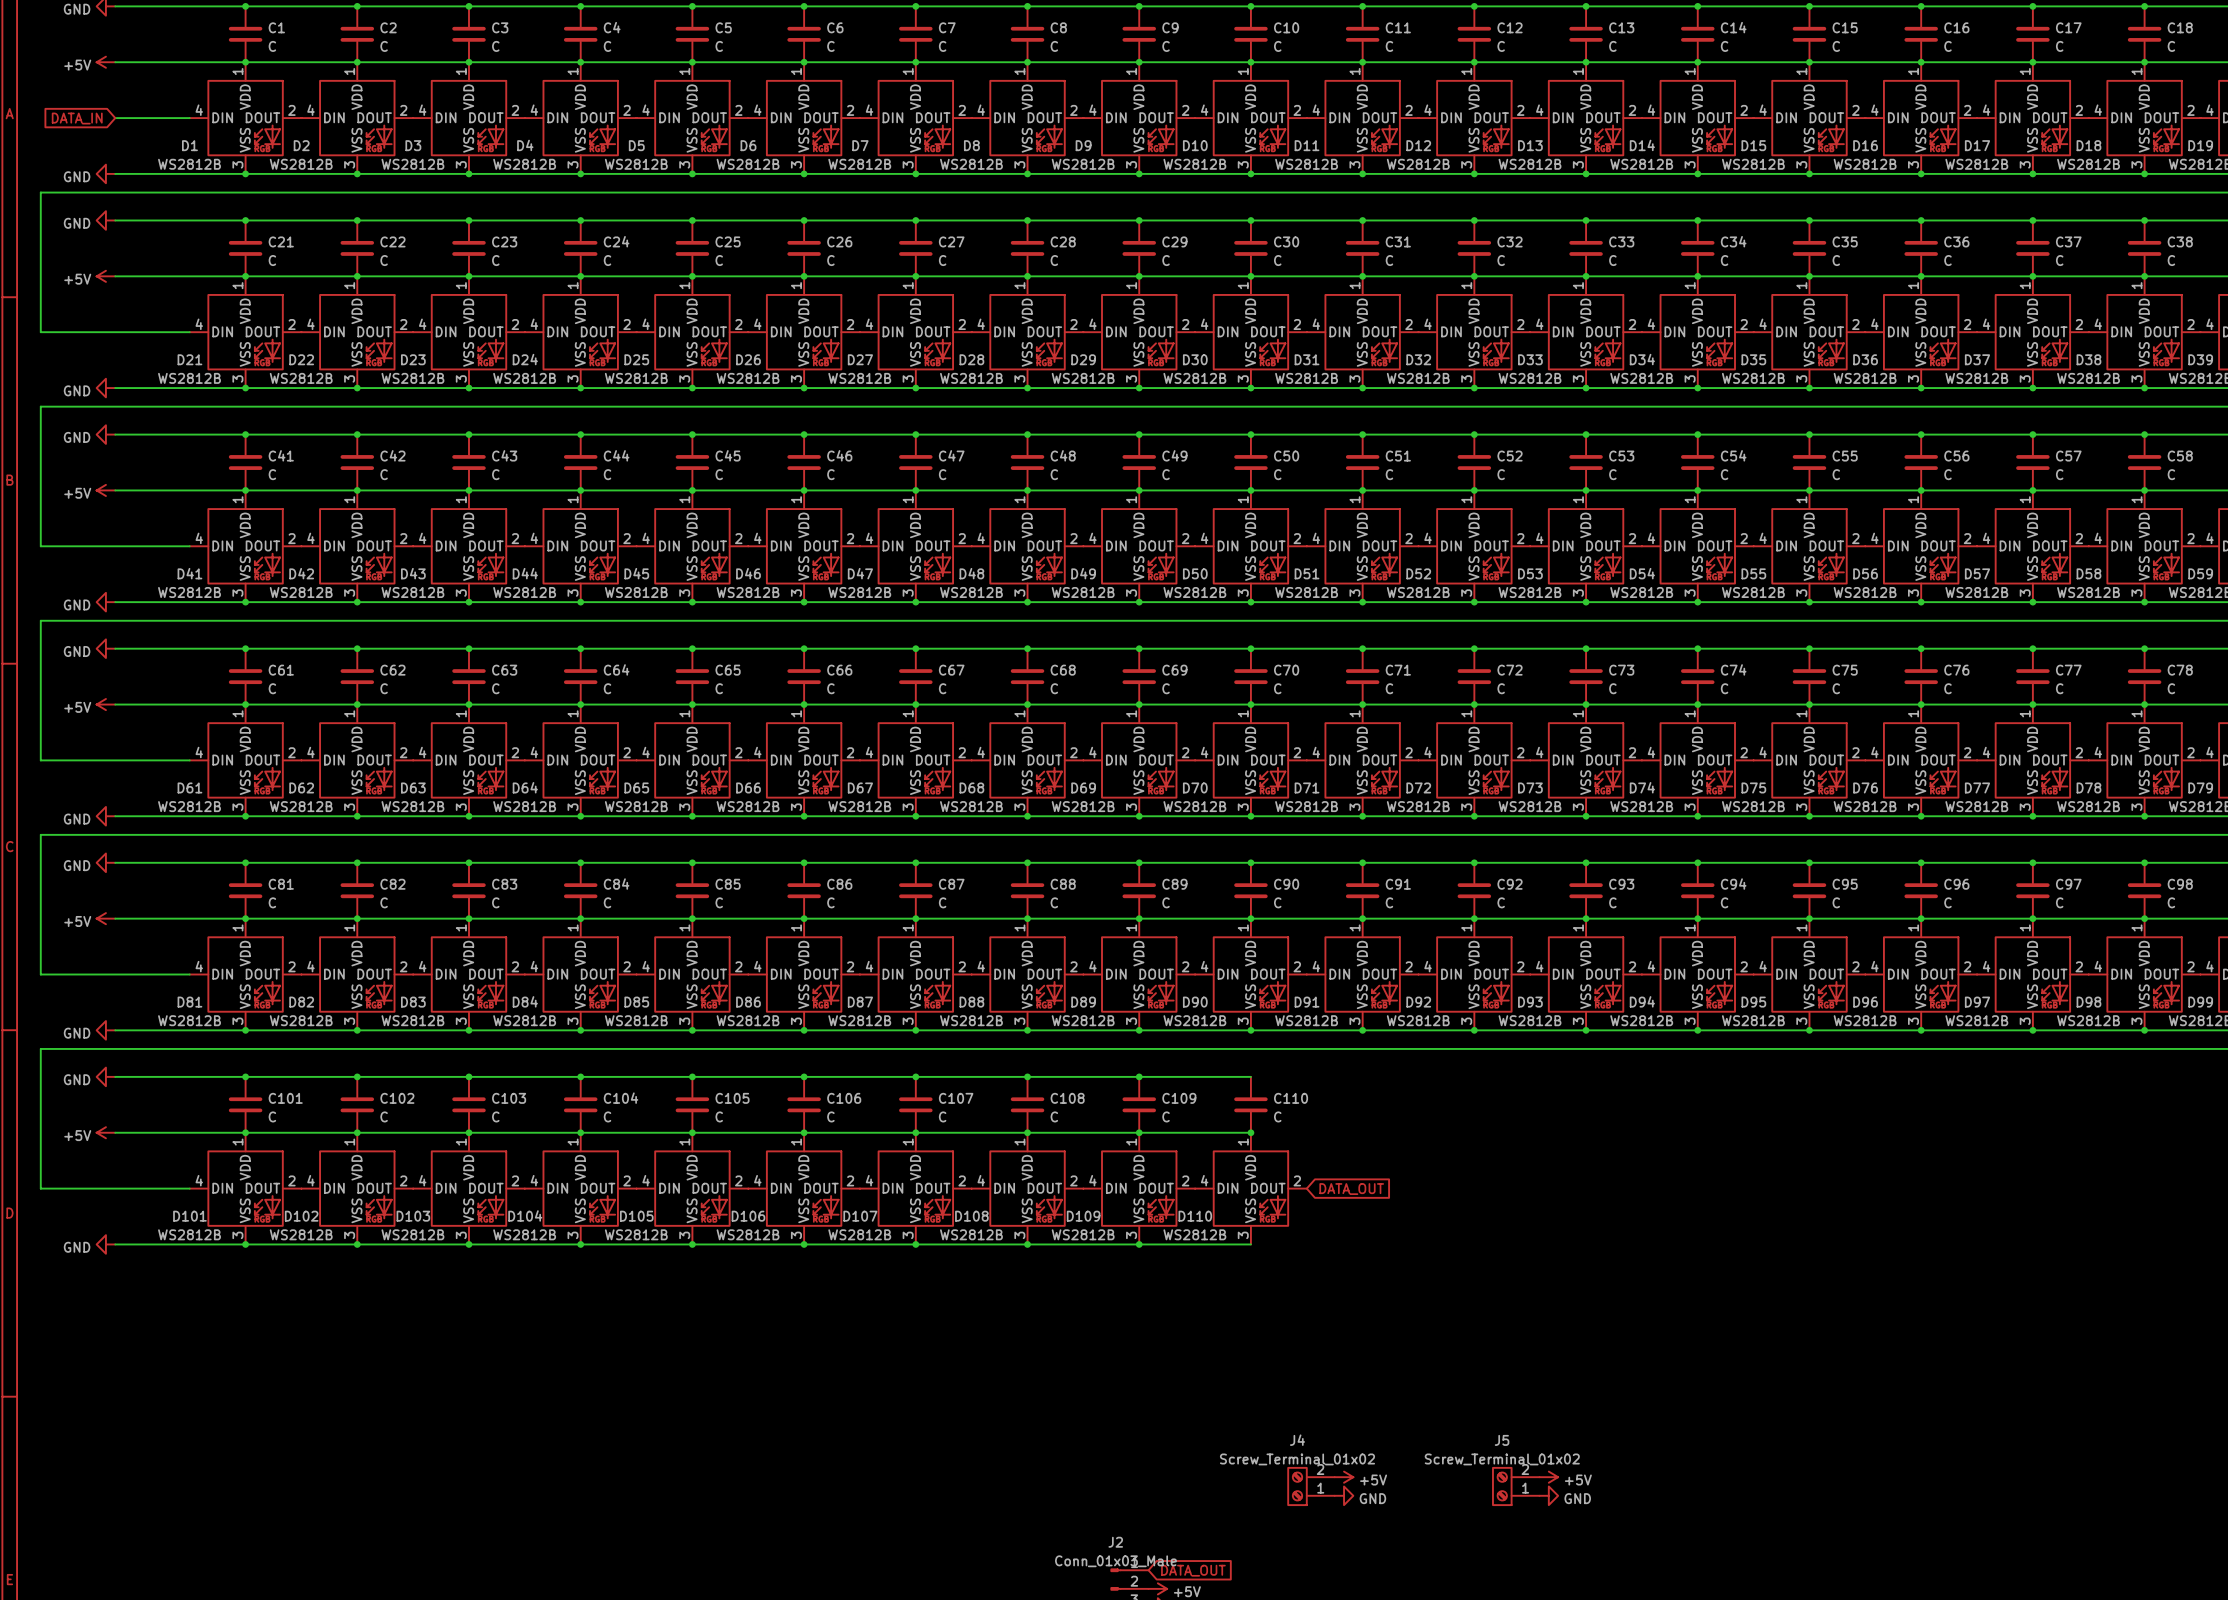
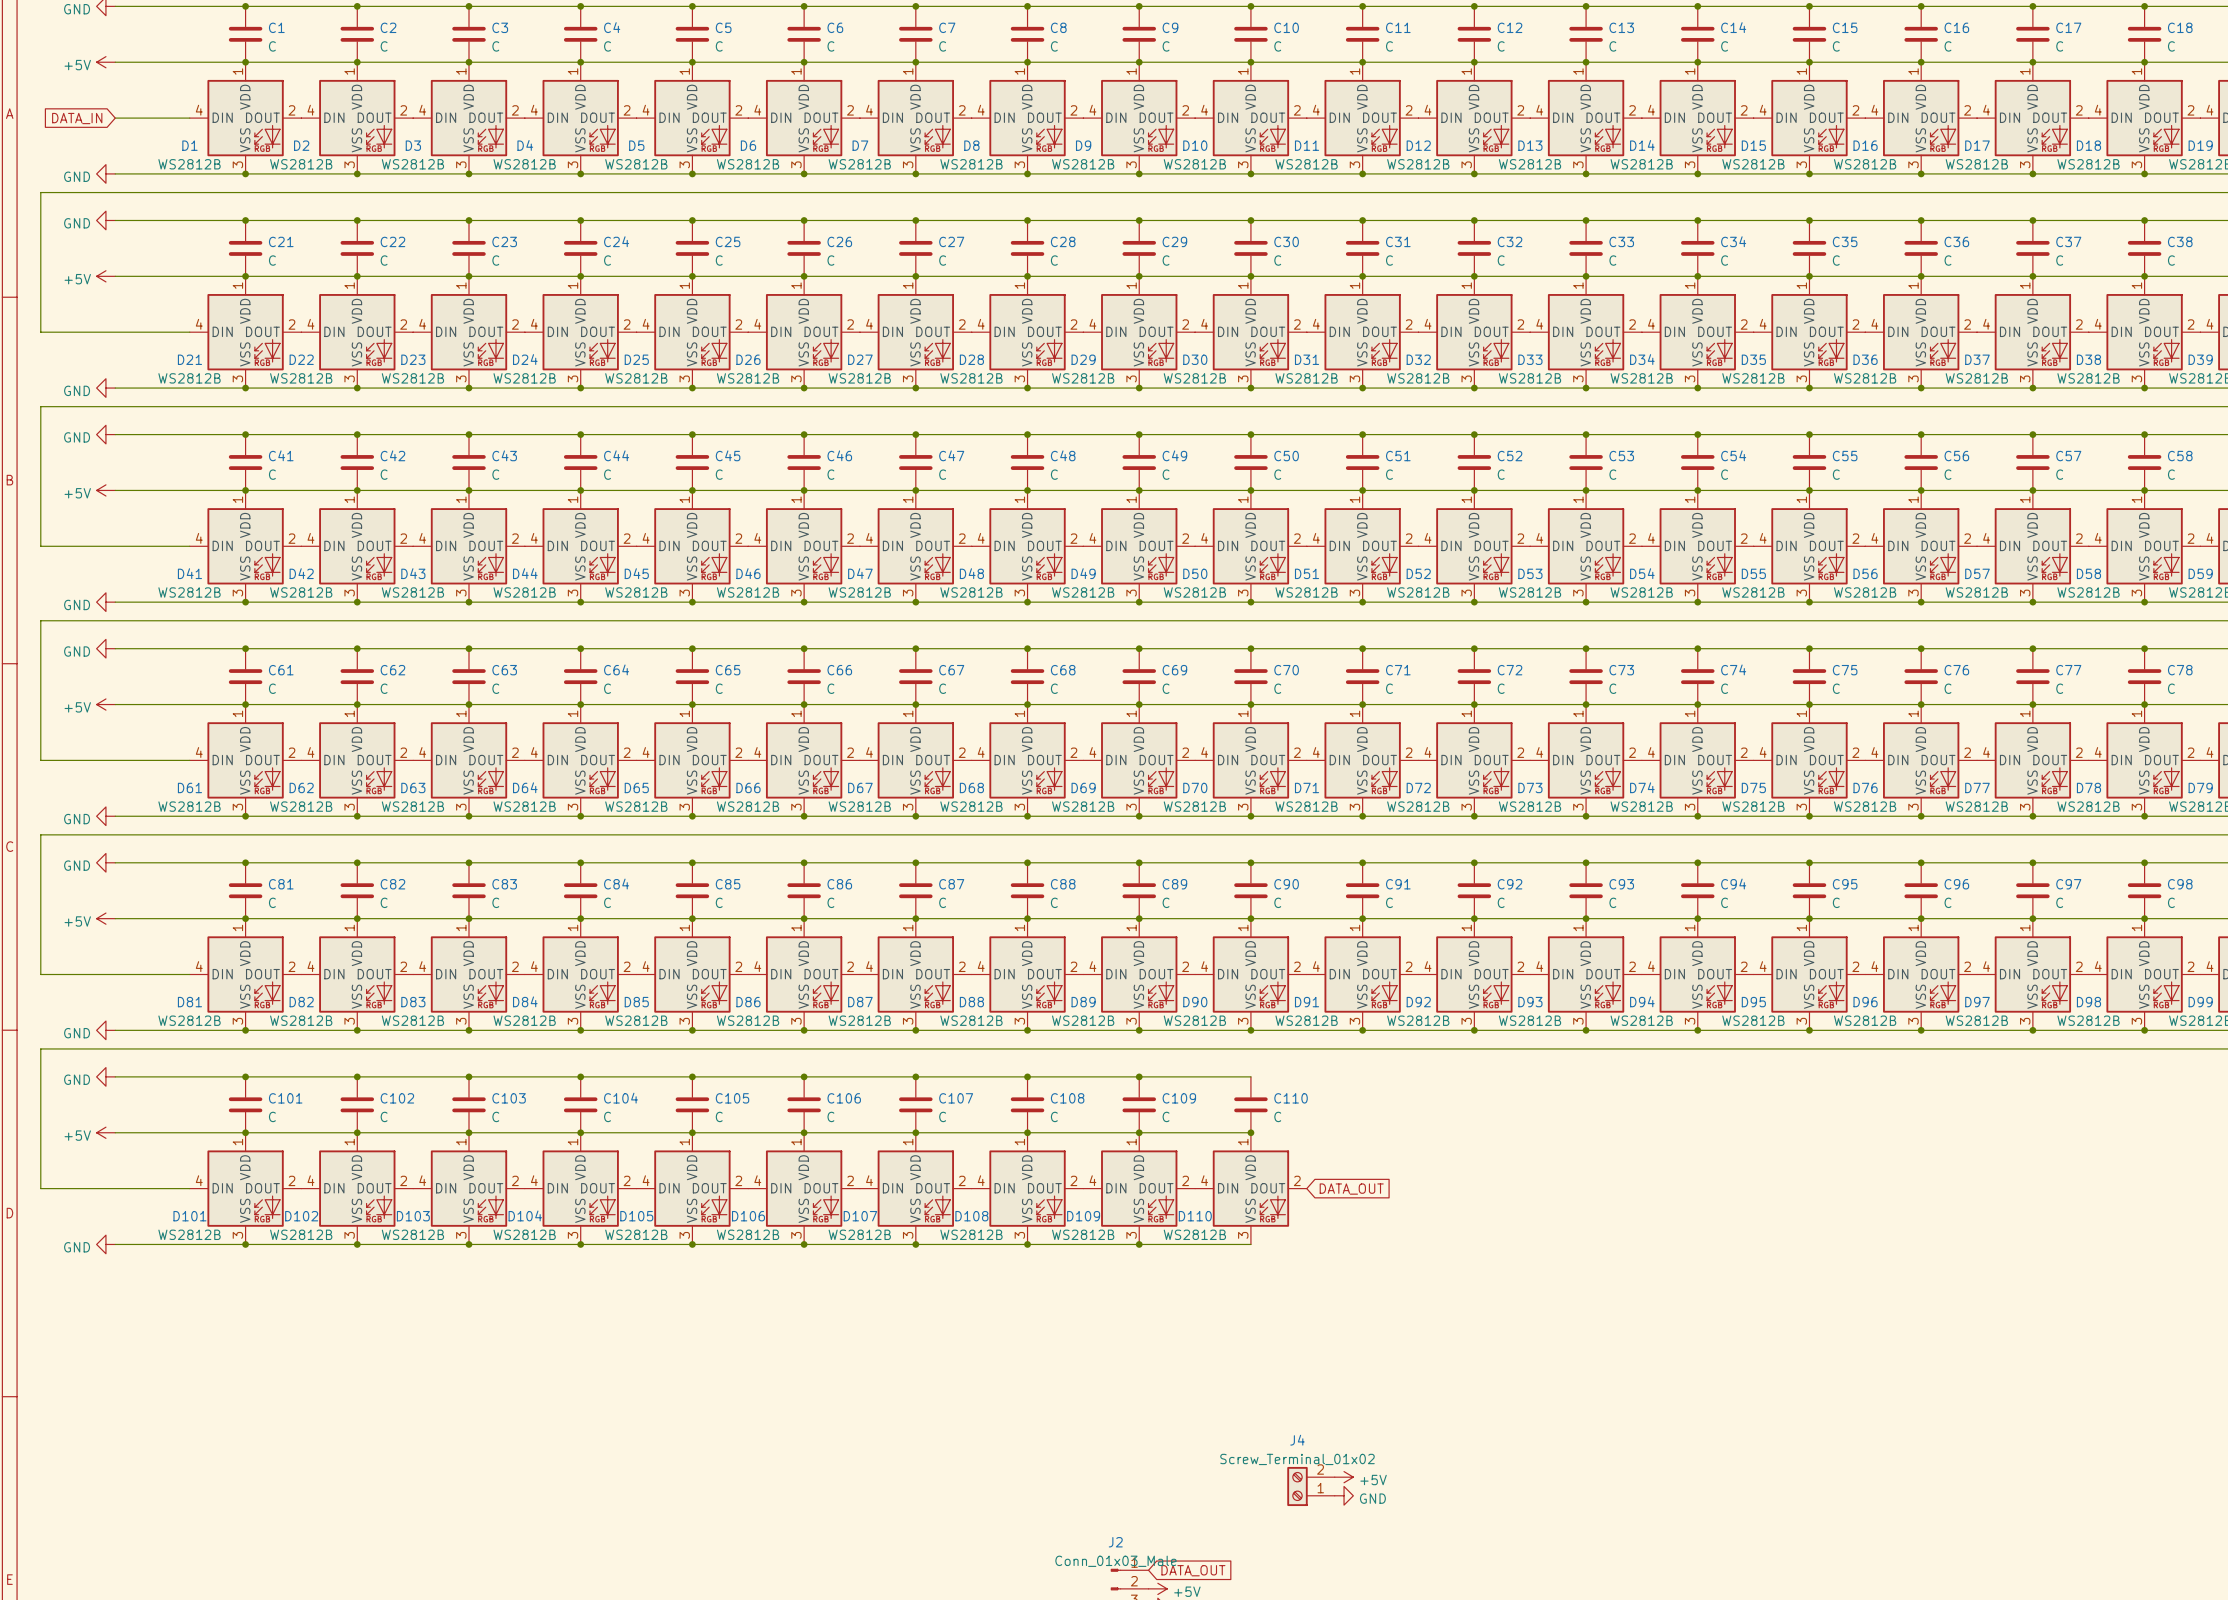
power symbol: +5V (1548, 1477) -> none
J5: Screw_Terminal_01x02 (1515, 1486) -> none
power symbol: GND (1548, 1495) -> none

